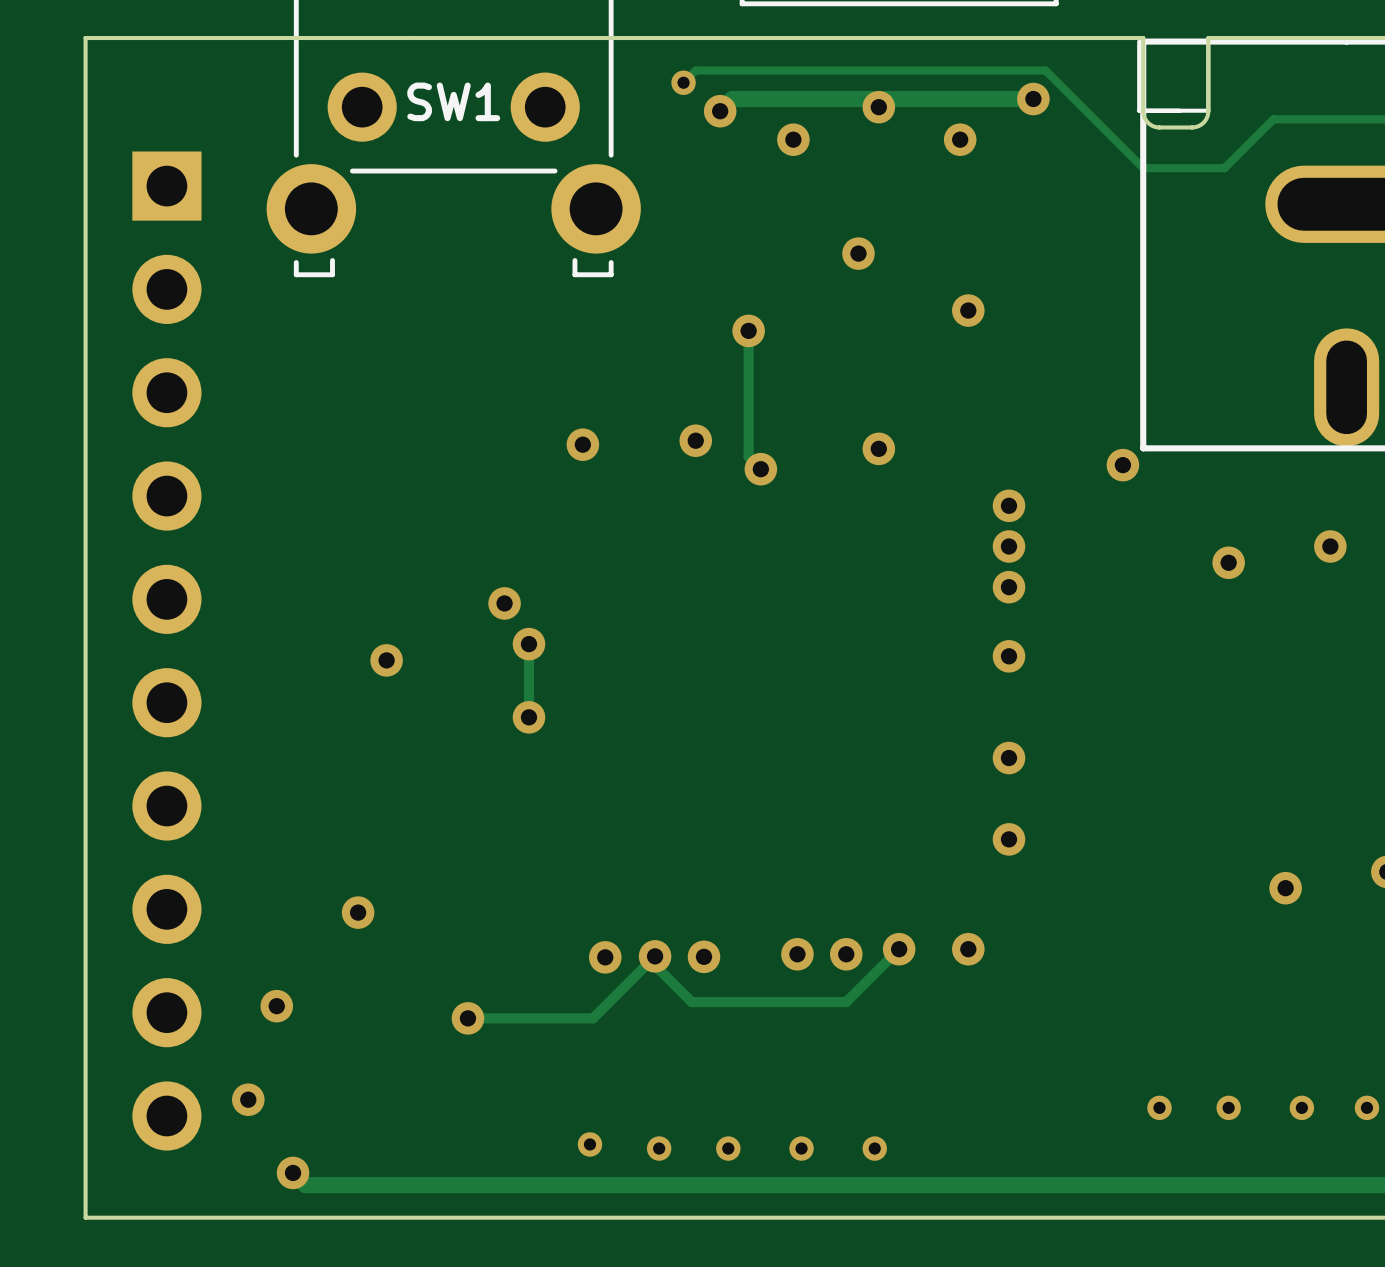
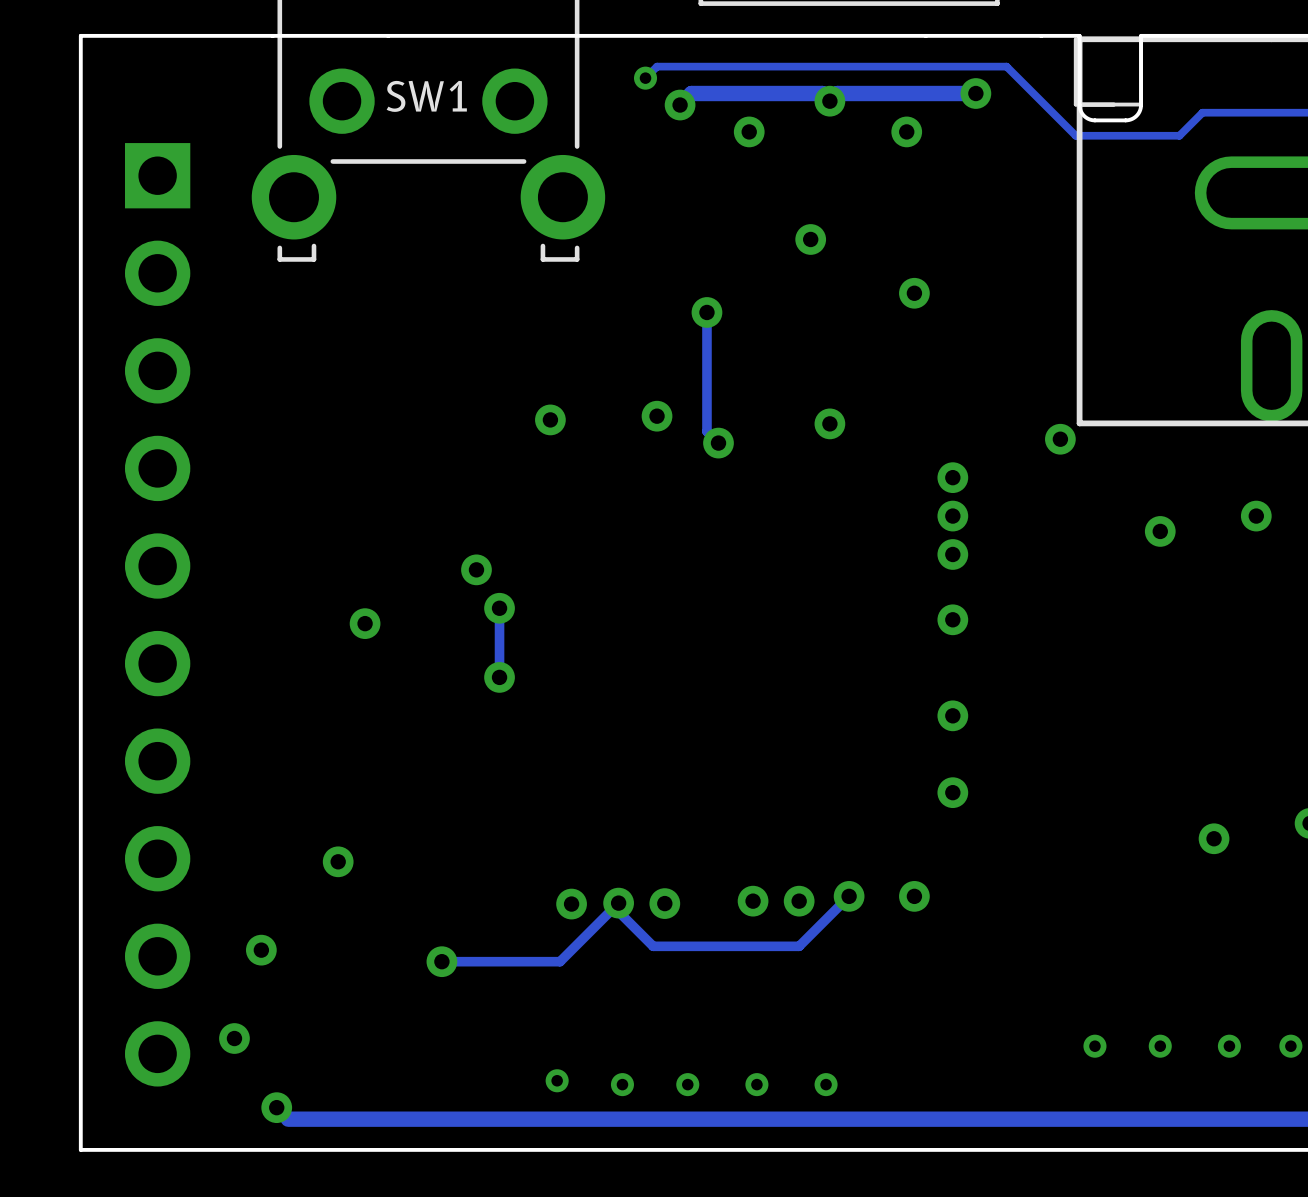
track: (1045, 70) (1143, 168) (1224, 168) (1249, 143) -> (987, 66) (1006, 66) (1075, 135) (1179, 135)

